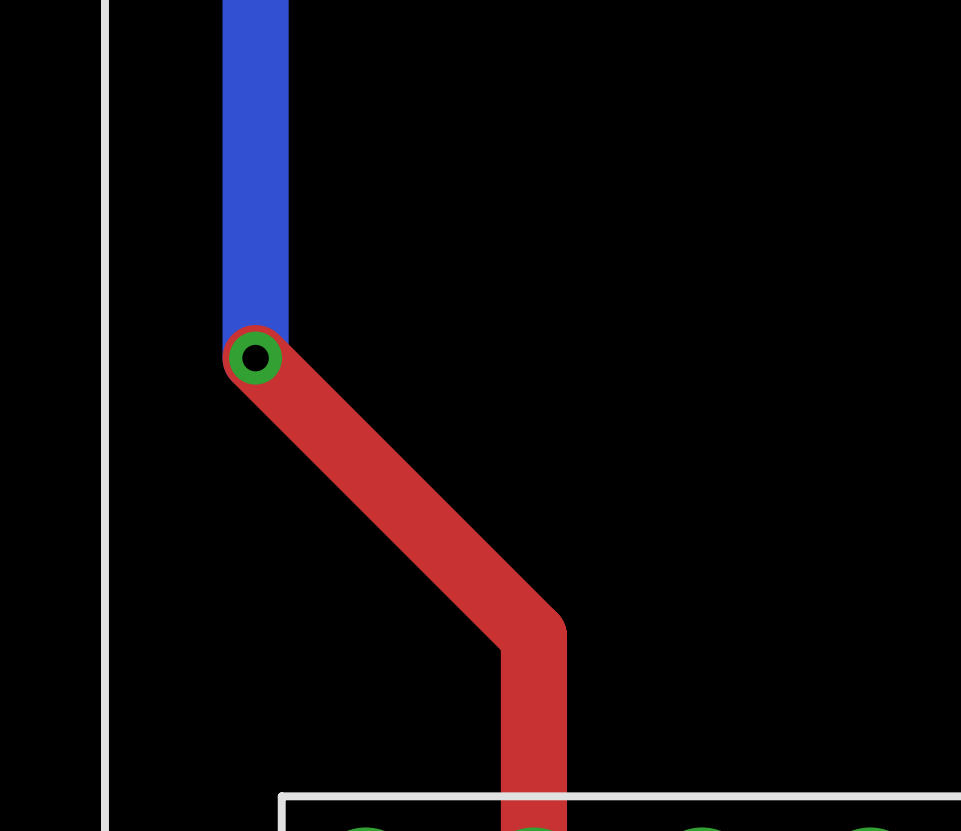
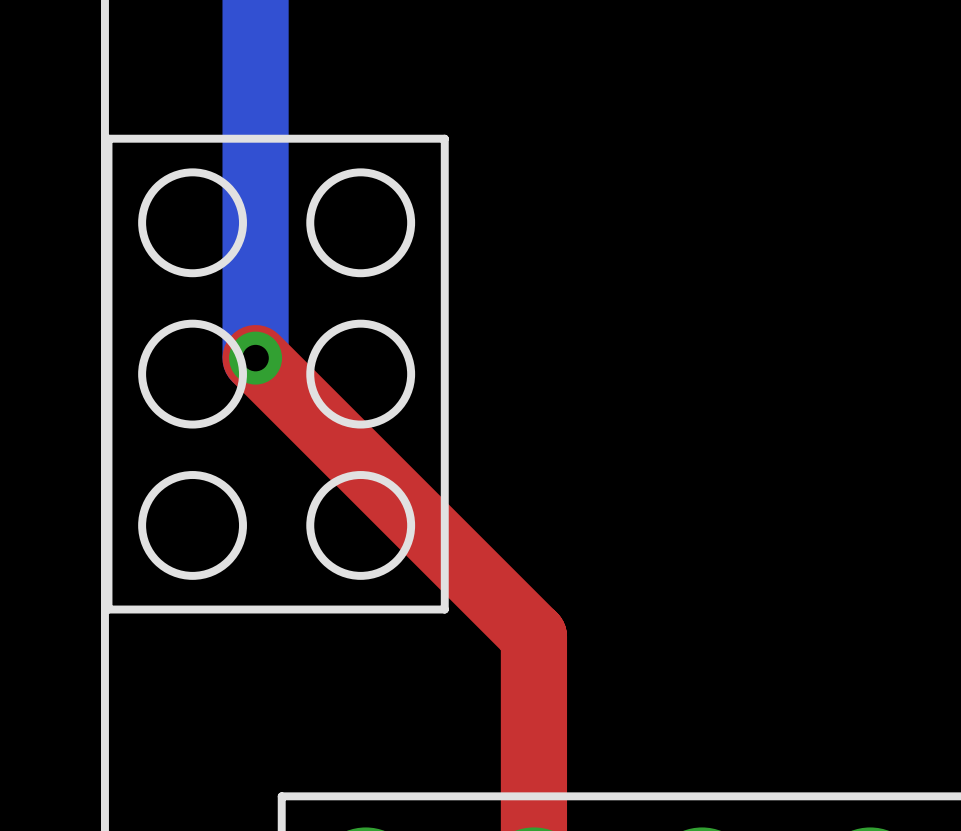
line: none -> (108, 138) (108, 609) (444, 609) (444, 138) (108, 138)
drawing: none -> [138, 168, 416, 580]

